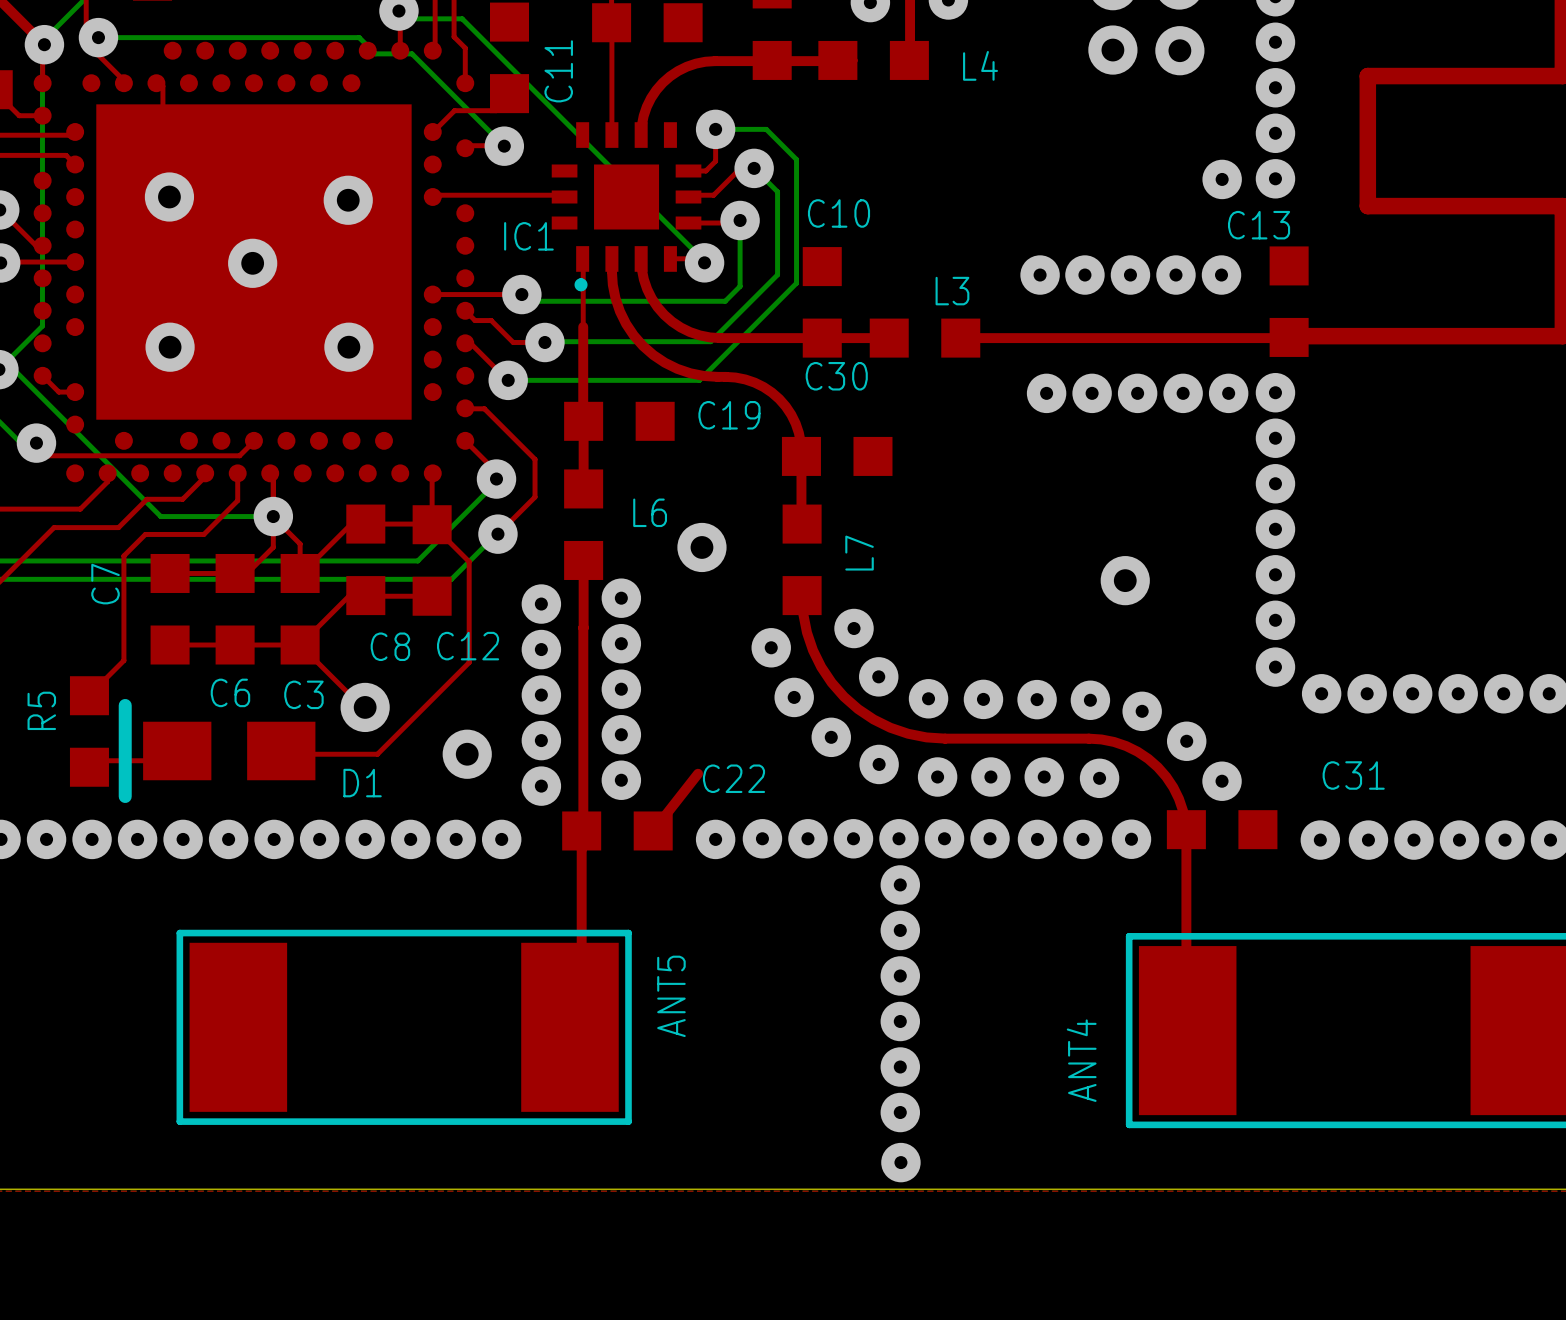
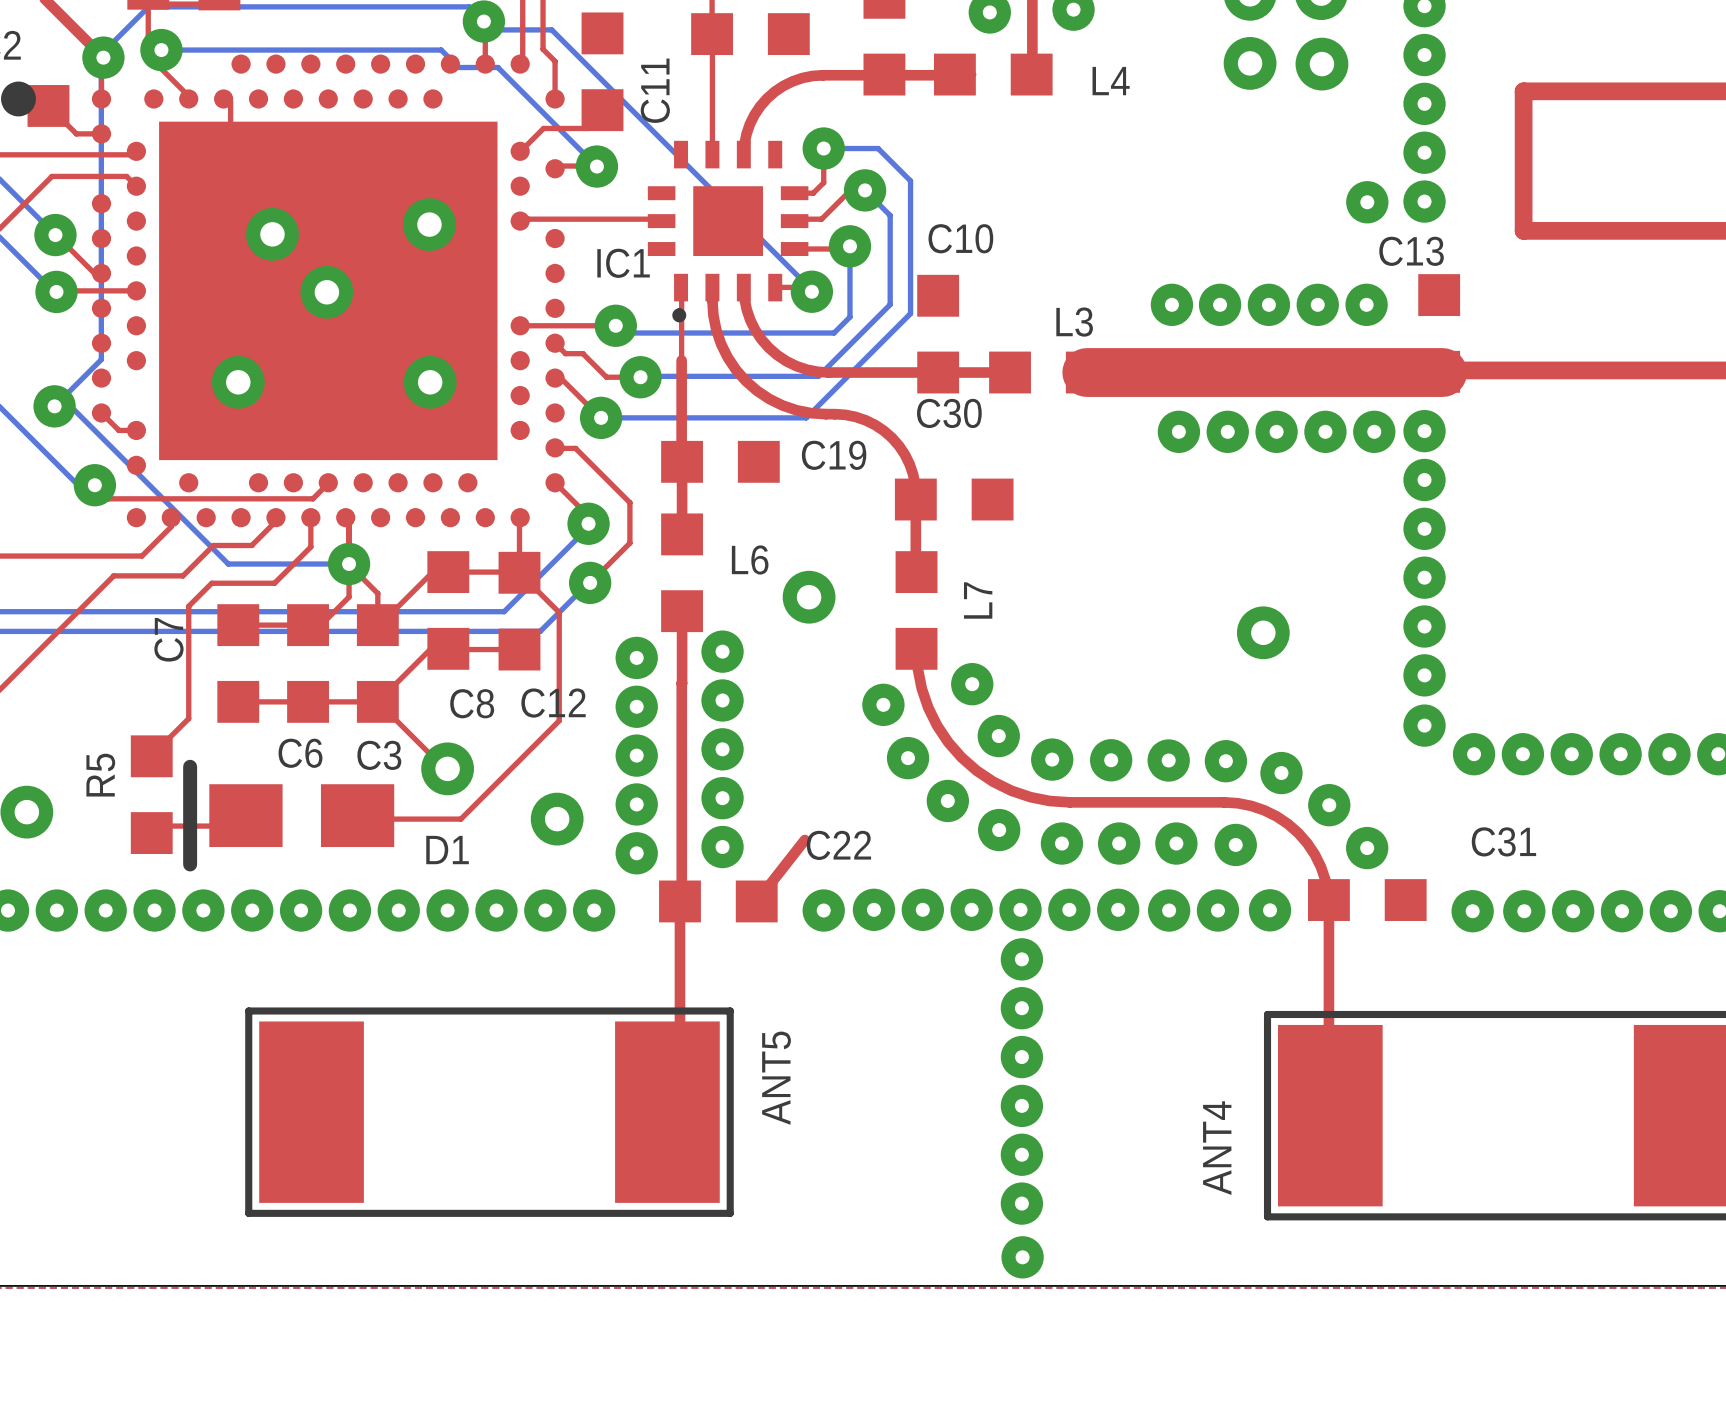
via position: (169, 197) -> (272, 234)
top track width: thin (960, 338) (1292, 338) -> thick (1086, 372) (1442, 372)

